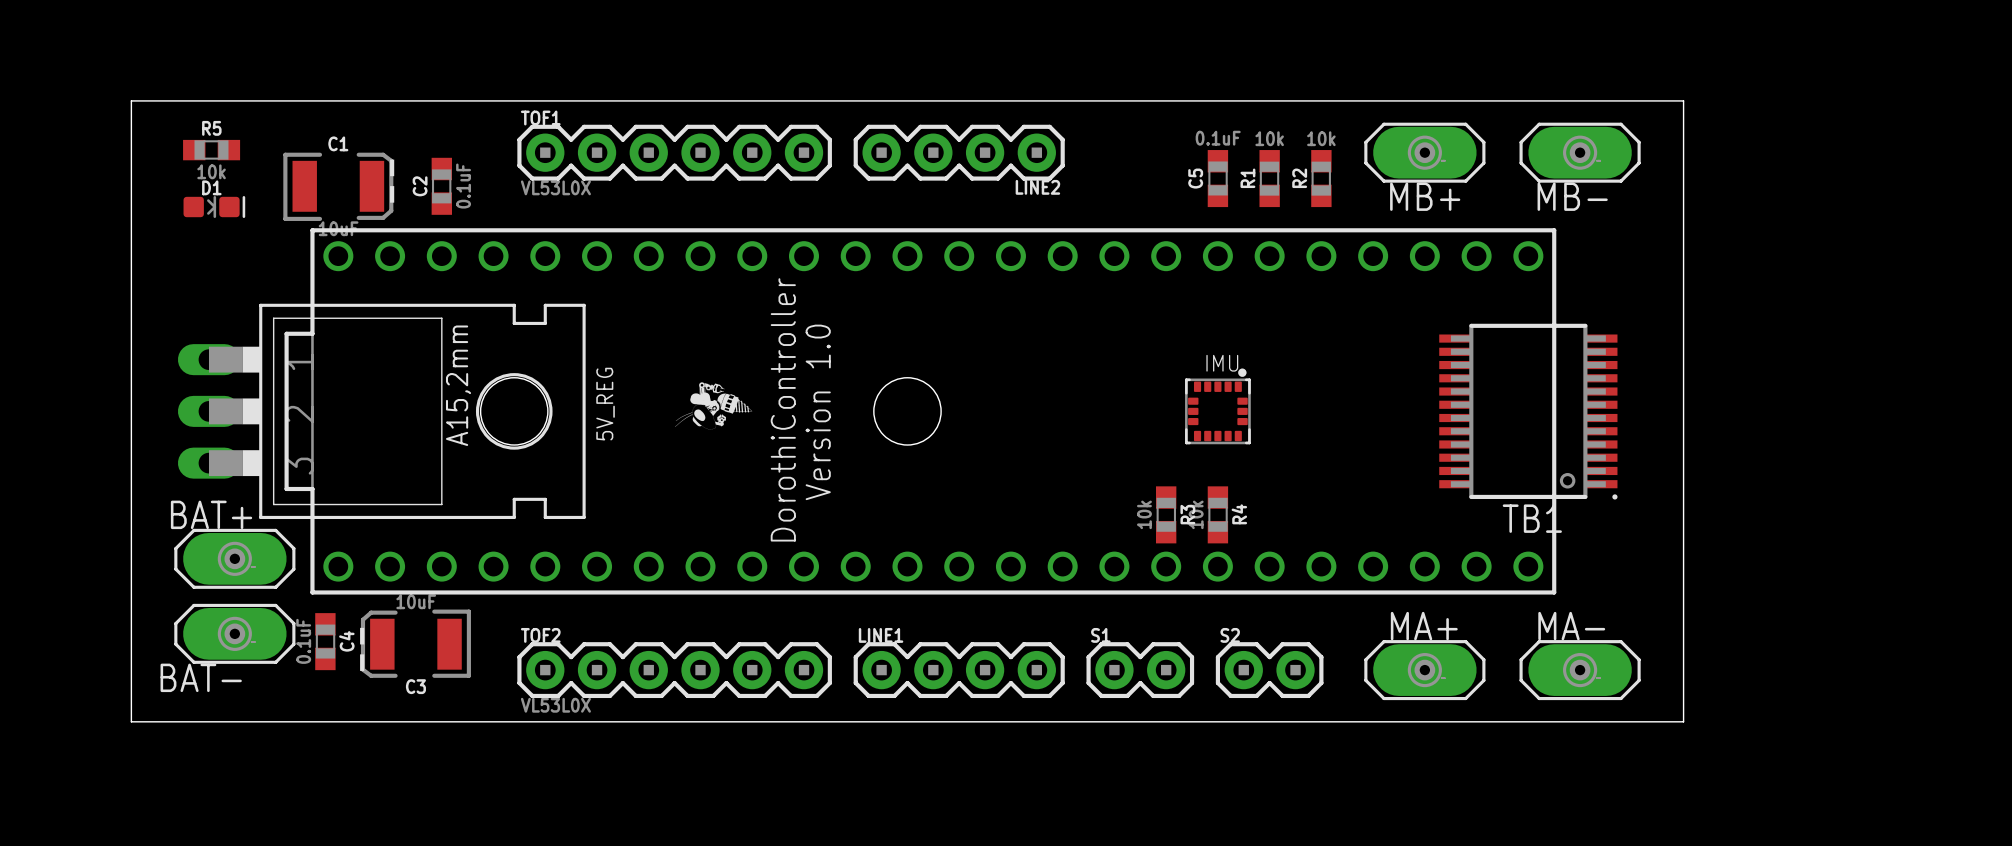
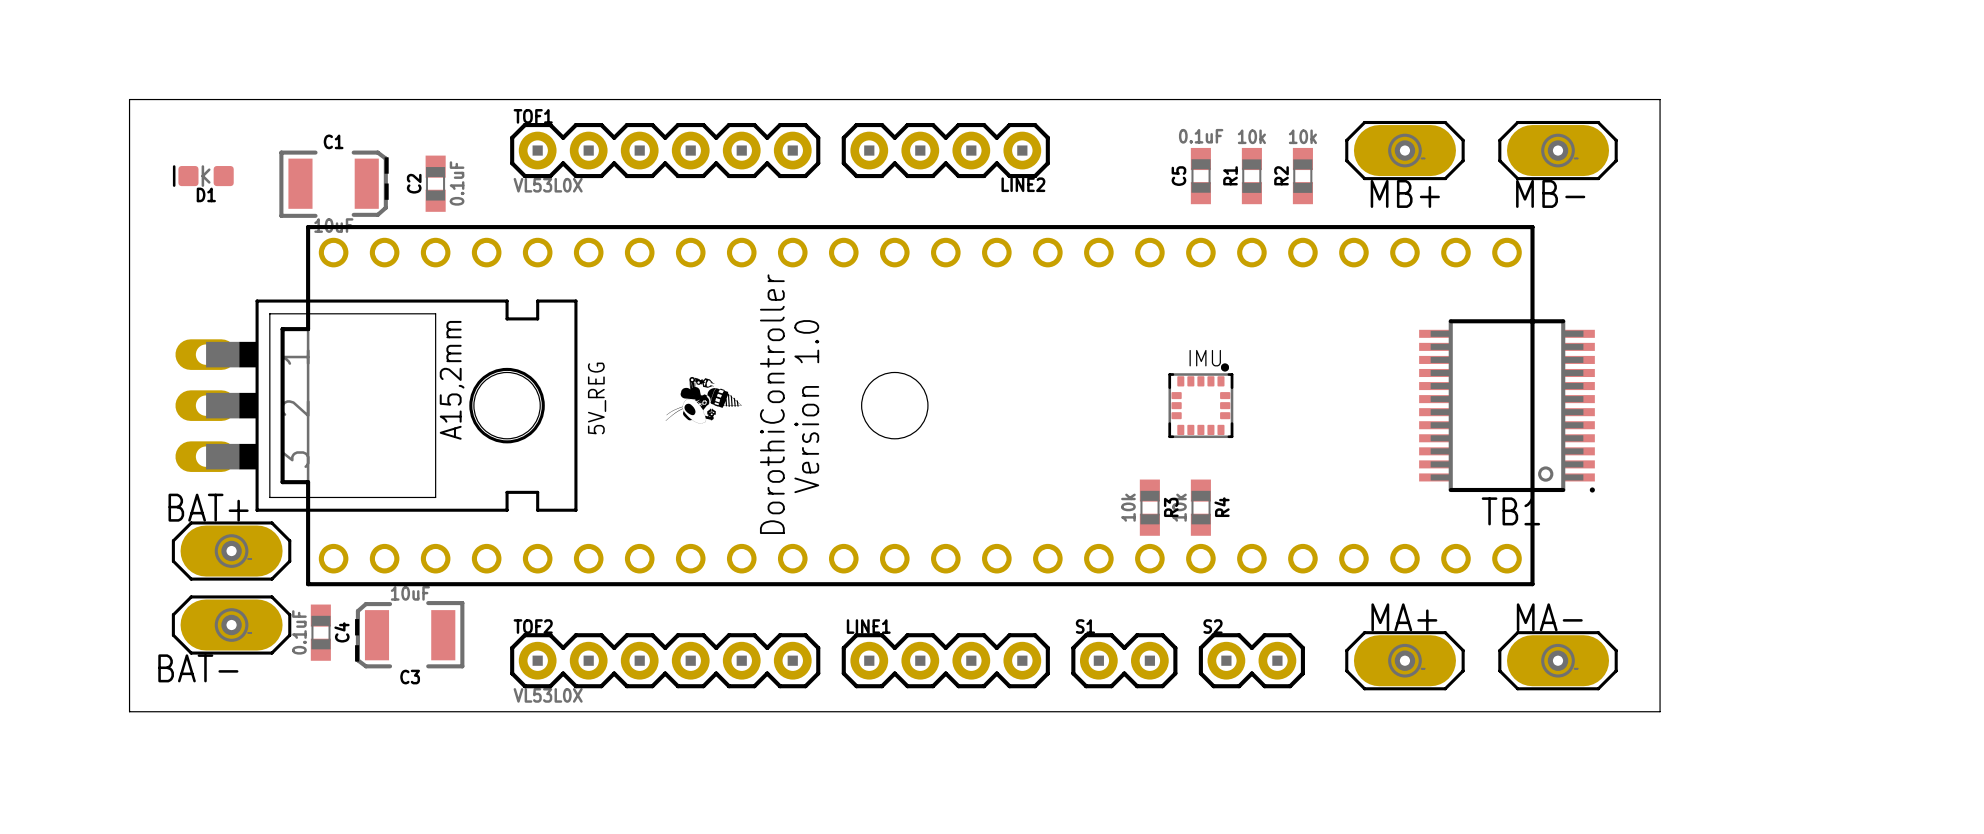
R5: 10k (211, 150) -> none
D1 rotation: 0° (214, 207) -> 180° (203, 176)

